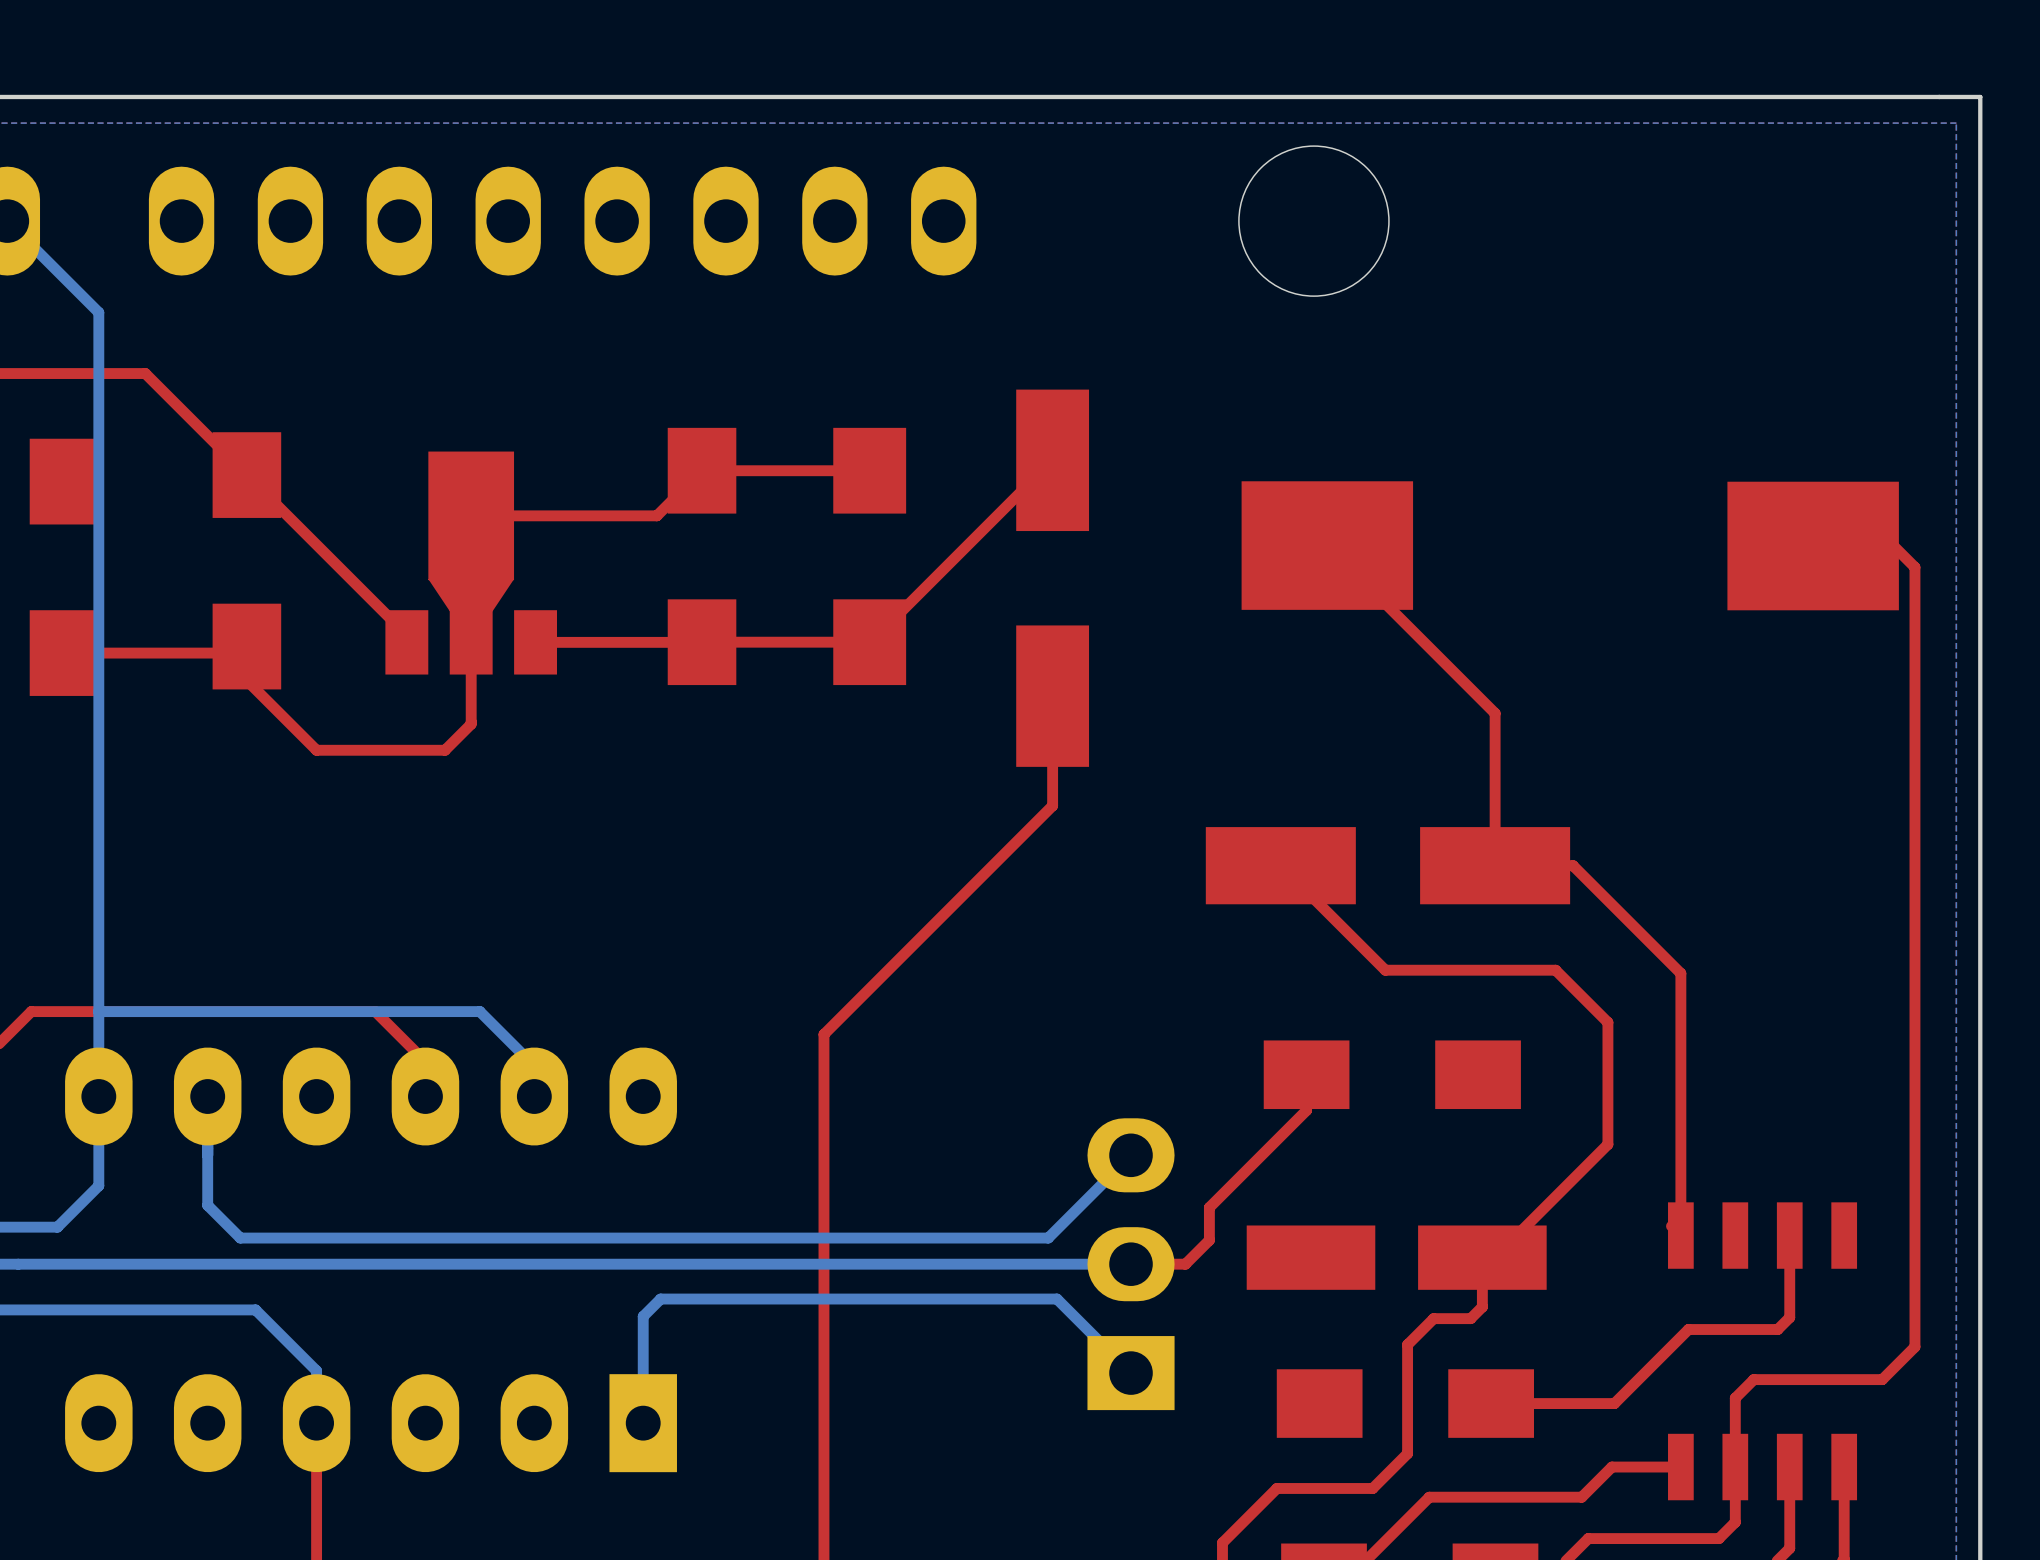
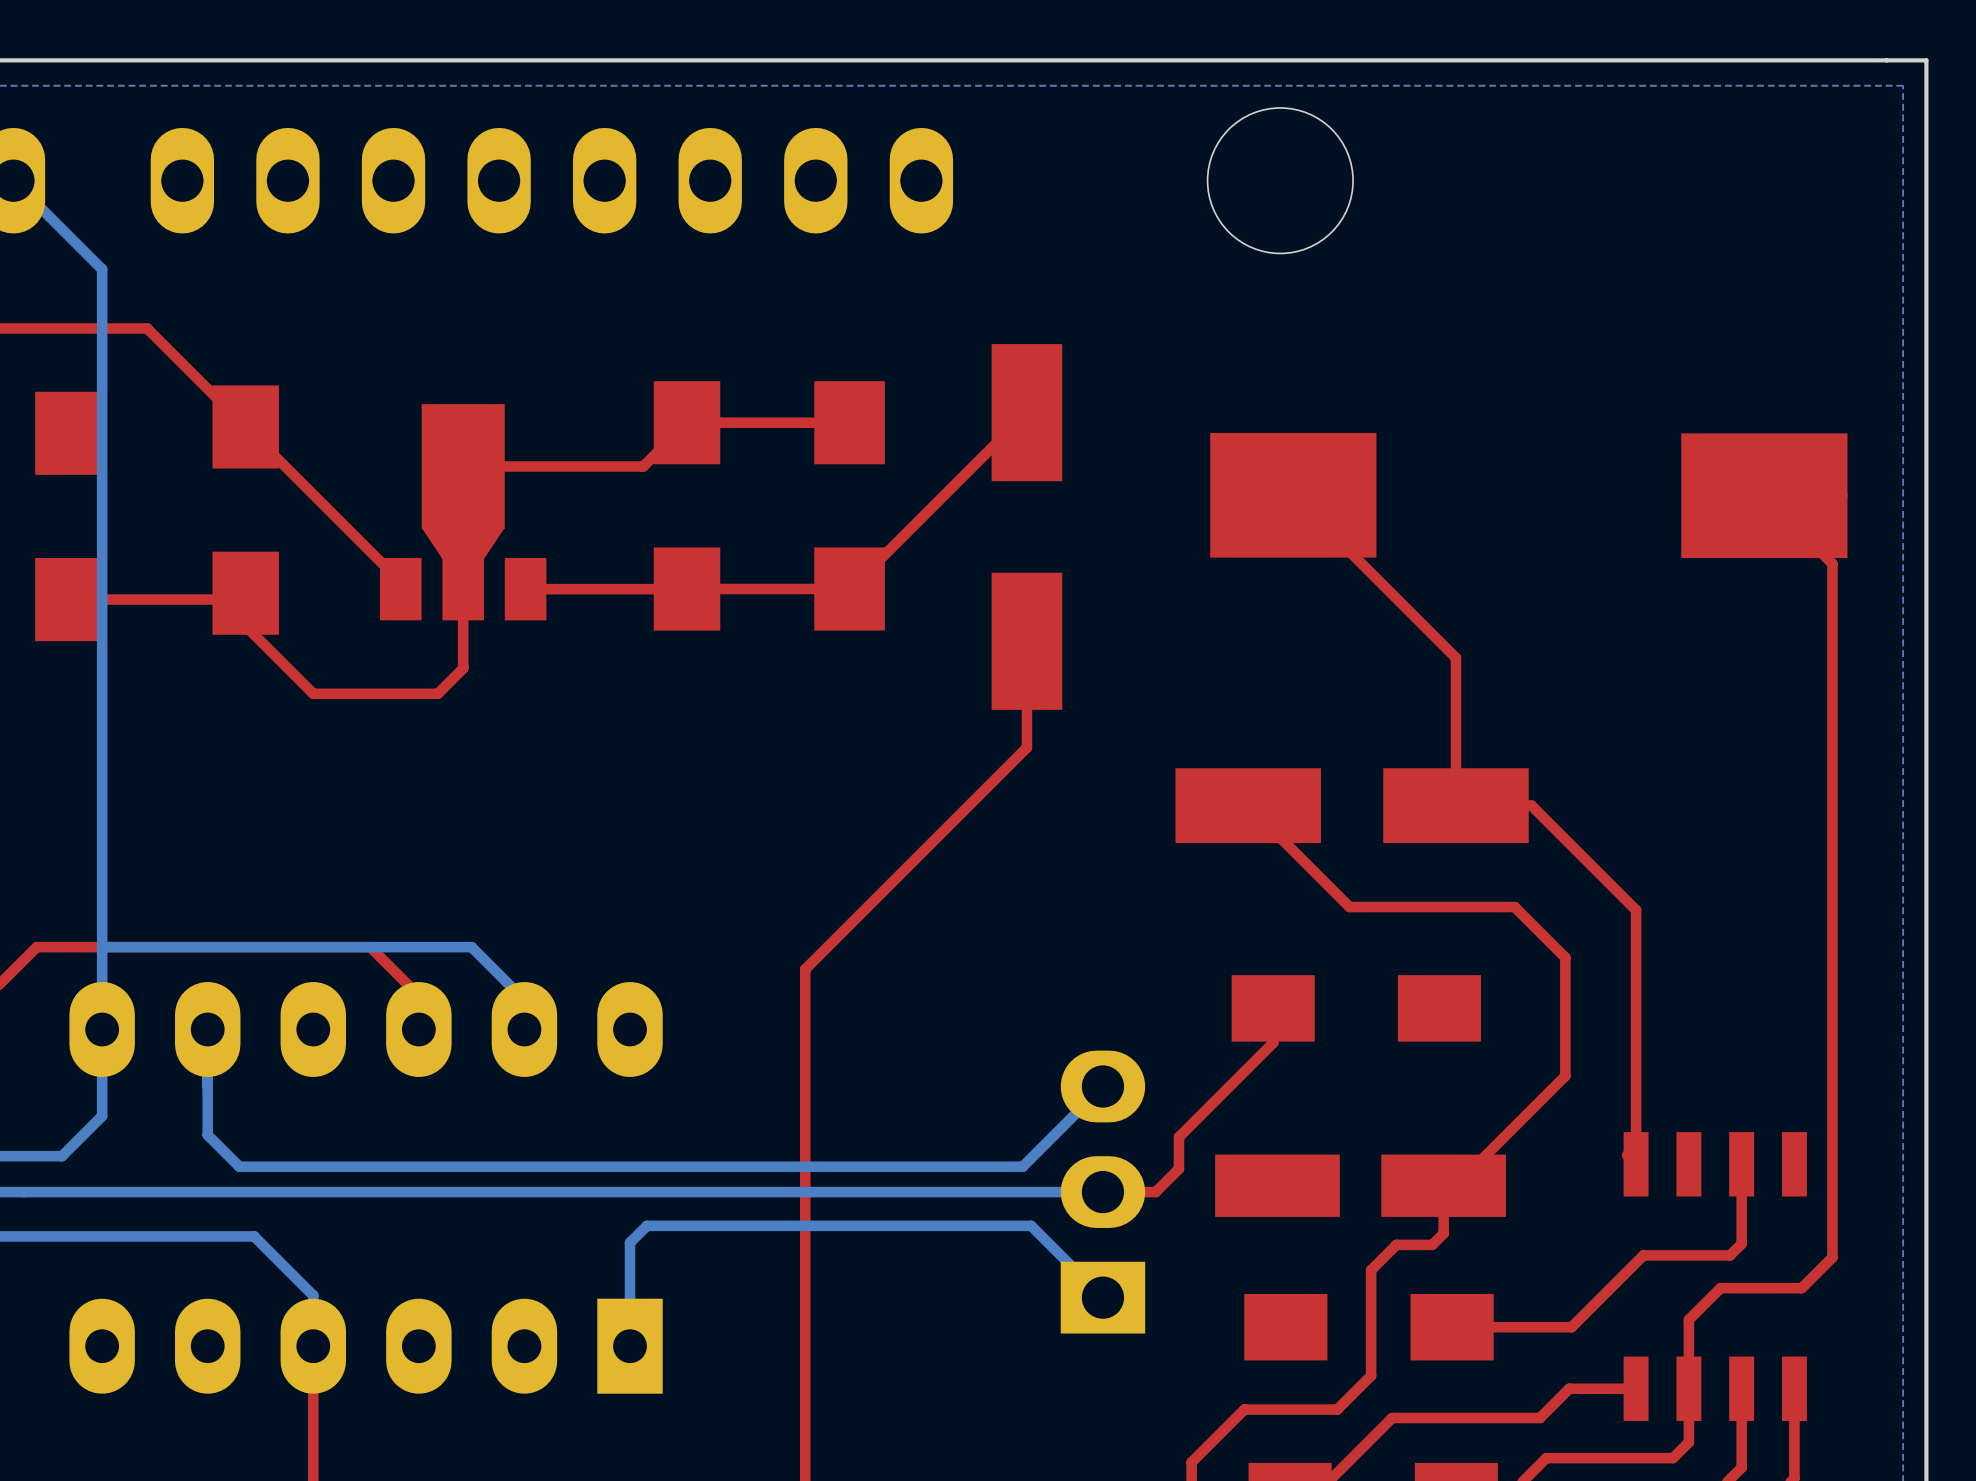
top track: (1893, 546) (1914, 567) (1914, 1346) (1882, 1379) (1753, 1379) (1735, 1398) -> (1764, 495) (1832, 563) (1832, 1257) (1801, 1288) (1720, 1288) (1688, 1321)

